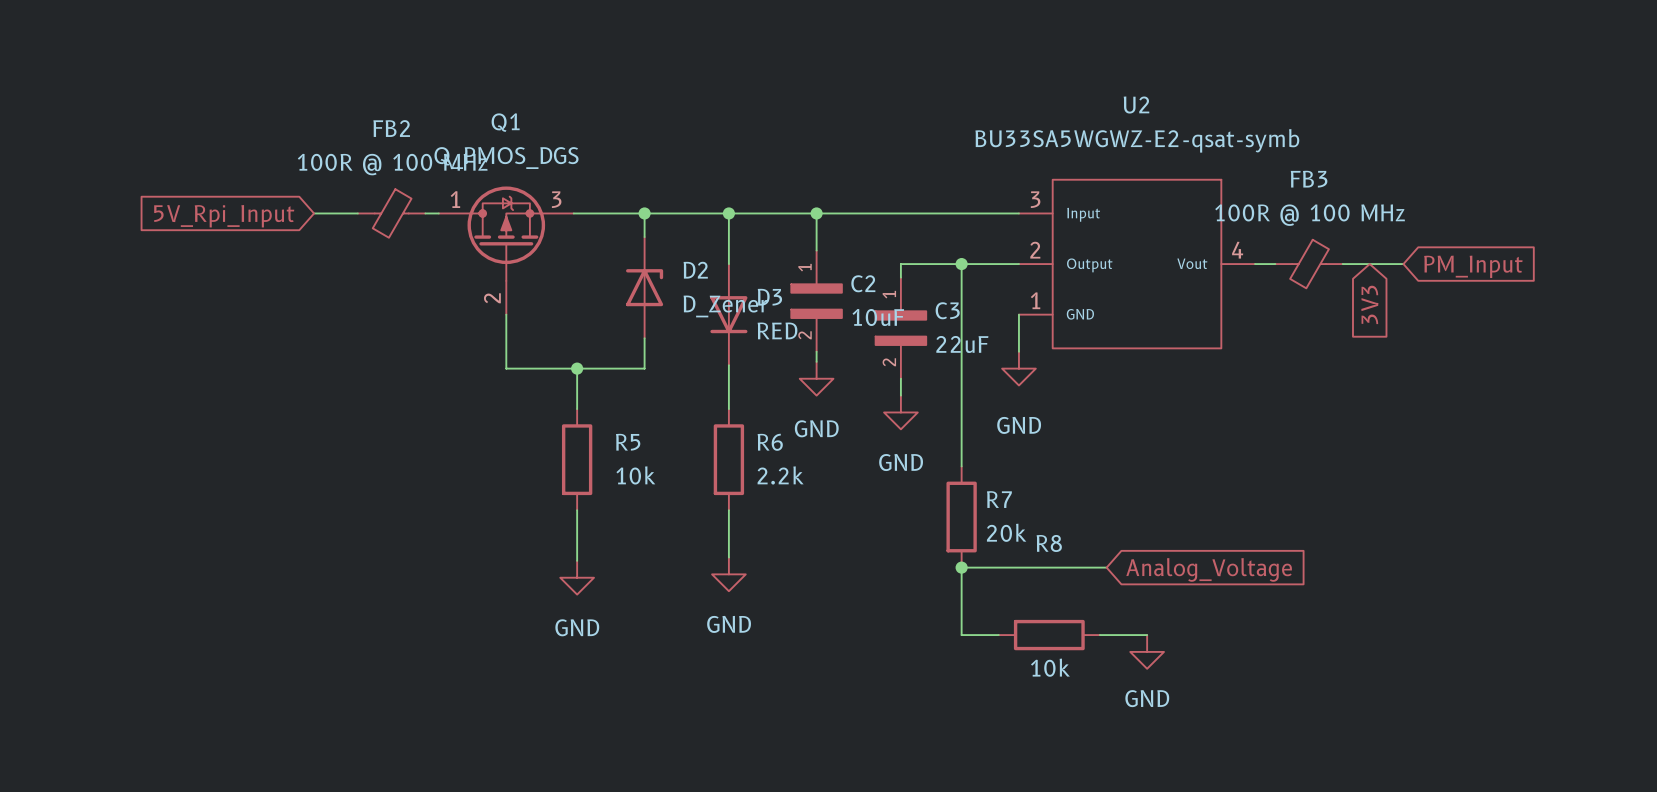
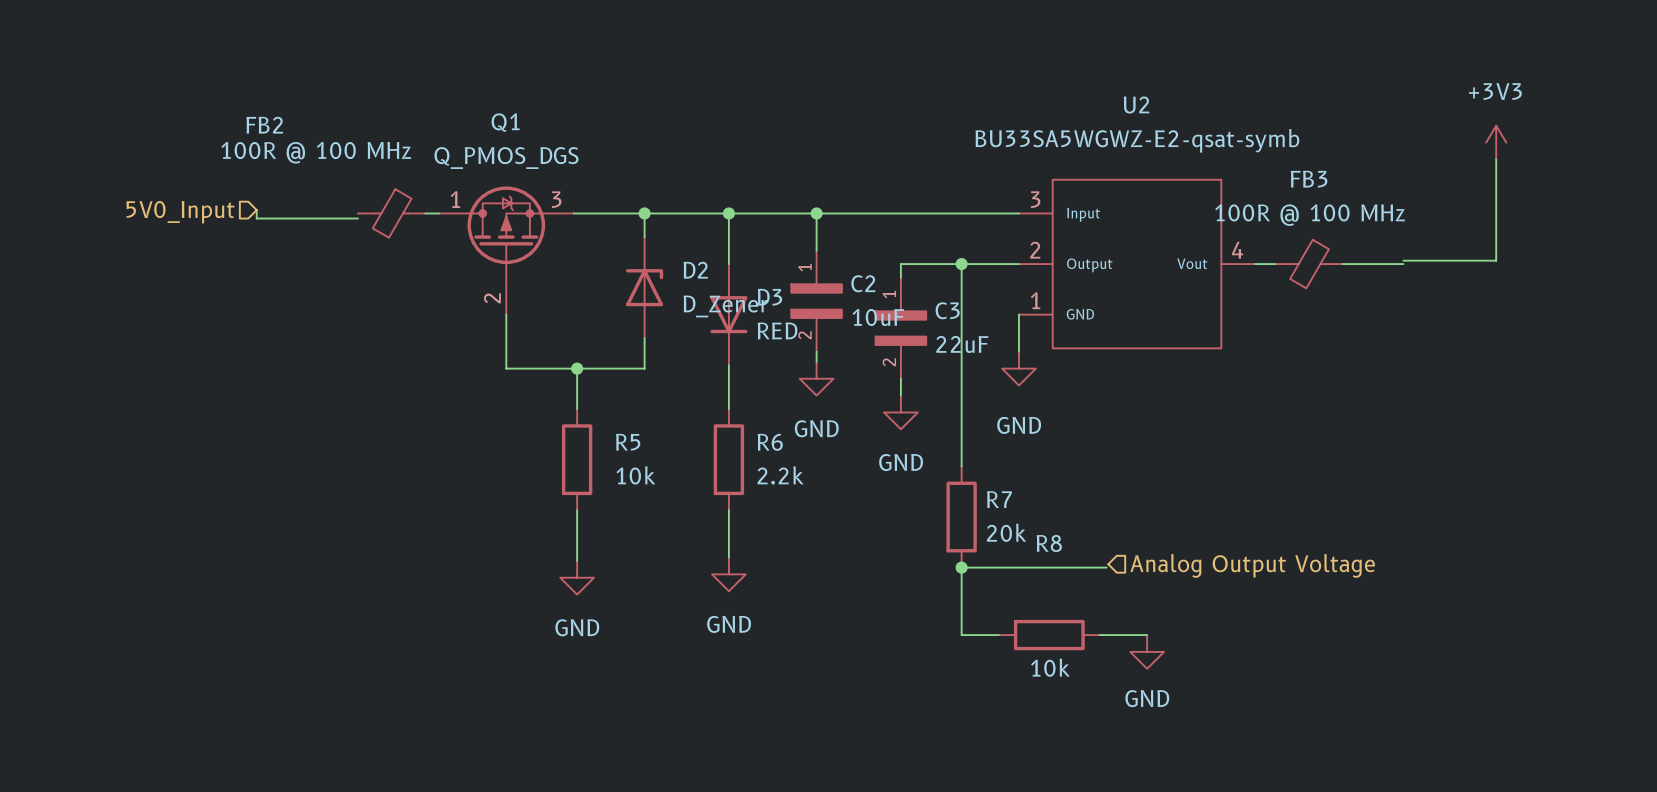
FB2 name position: FB2 (391, 128) -> FB2 (264, 125)
power symbol: none -> +3V3 (1496, 142)
wire: none -> (1496, 159) (1496, 260) (1403, 260)
FB2 value position: 100R @ 100 MHz (392, 164) -> 100R @ 100 MHz (316, 152)
wire: none -> (256, 210) (256, 218) (357, 218)
hierarchical label: none -> 5V0_Input (180, 212)
wire: (314, 213) (357, 213) -> none
global label: 5V_Rpi_Input (224, 216) -> none
global label: PM_Input (1473, 266) -> none
global label: 3V3 (1369, 304) -> none
hierarchical label: none -> Analog Output Voltage (1252, 565)
global label: Analog_Voltage (1209, 569) -> none

